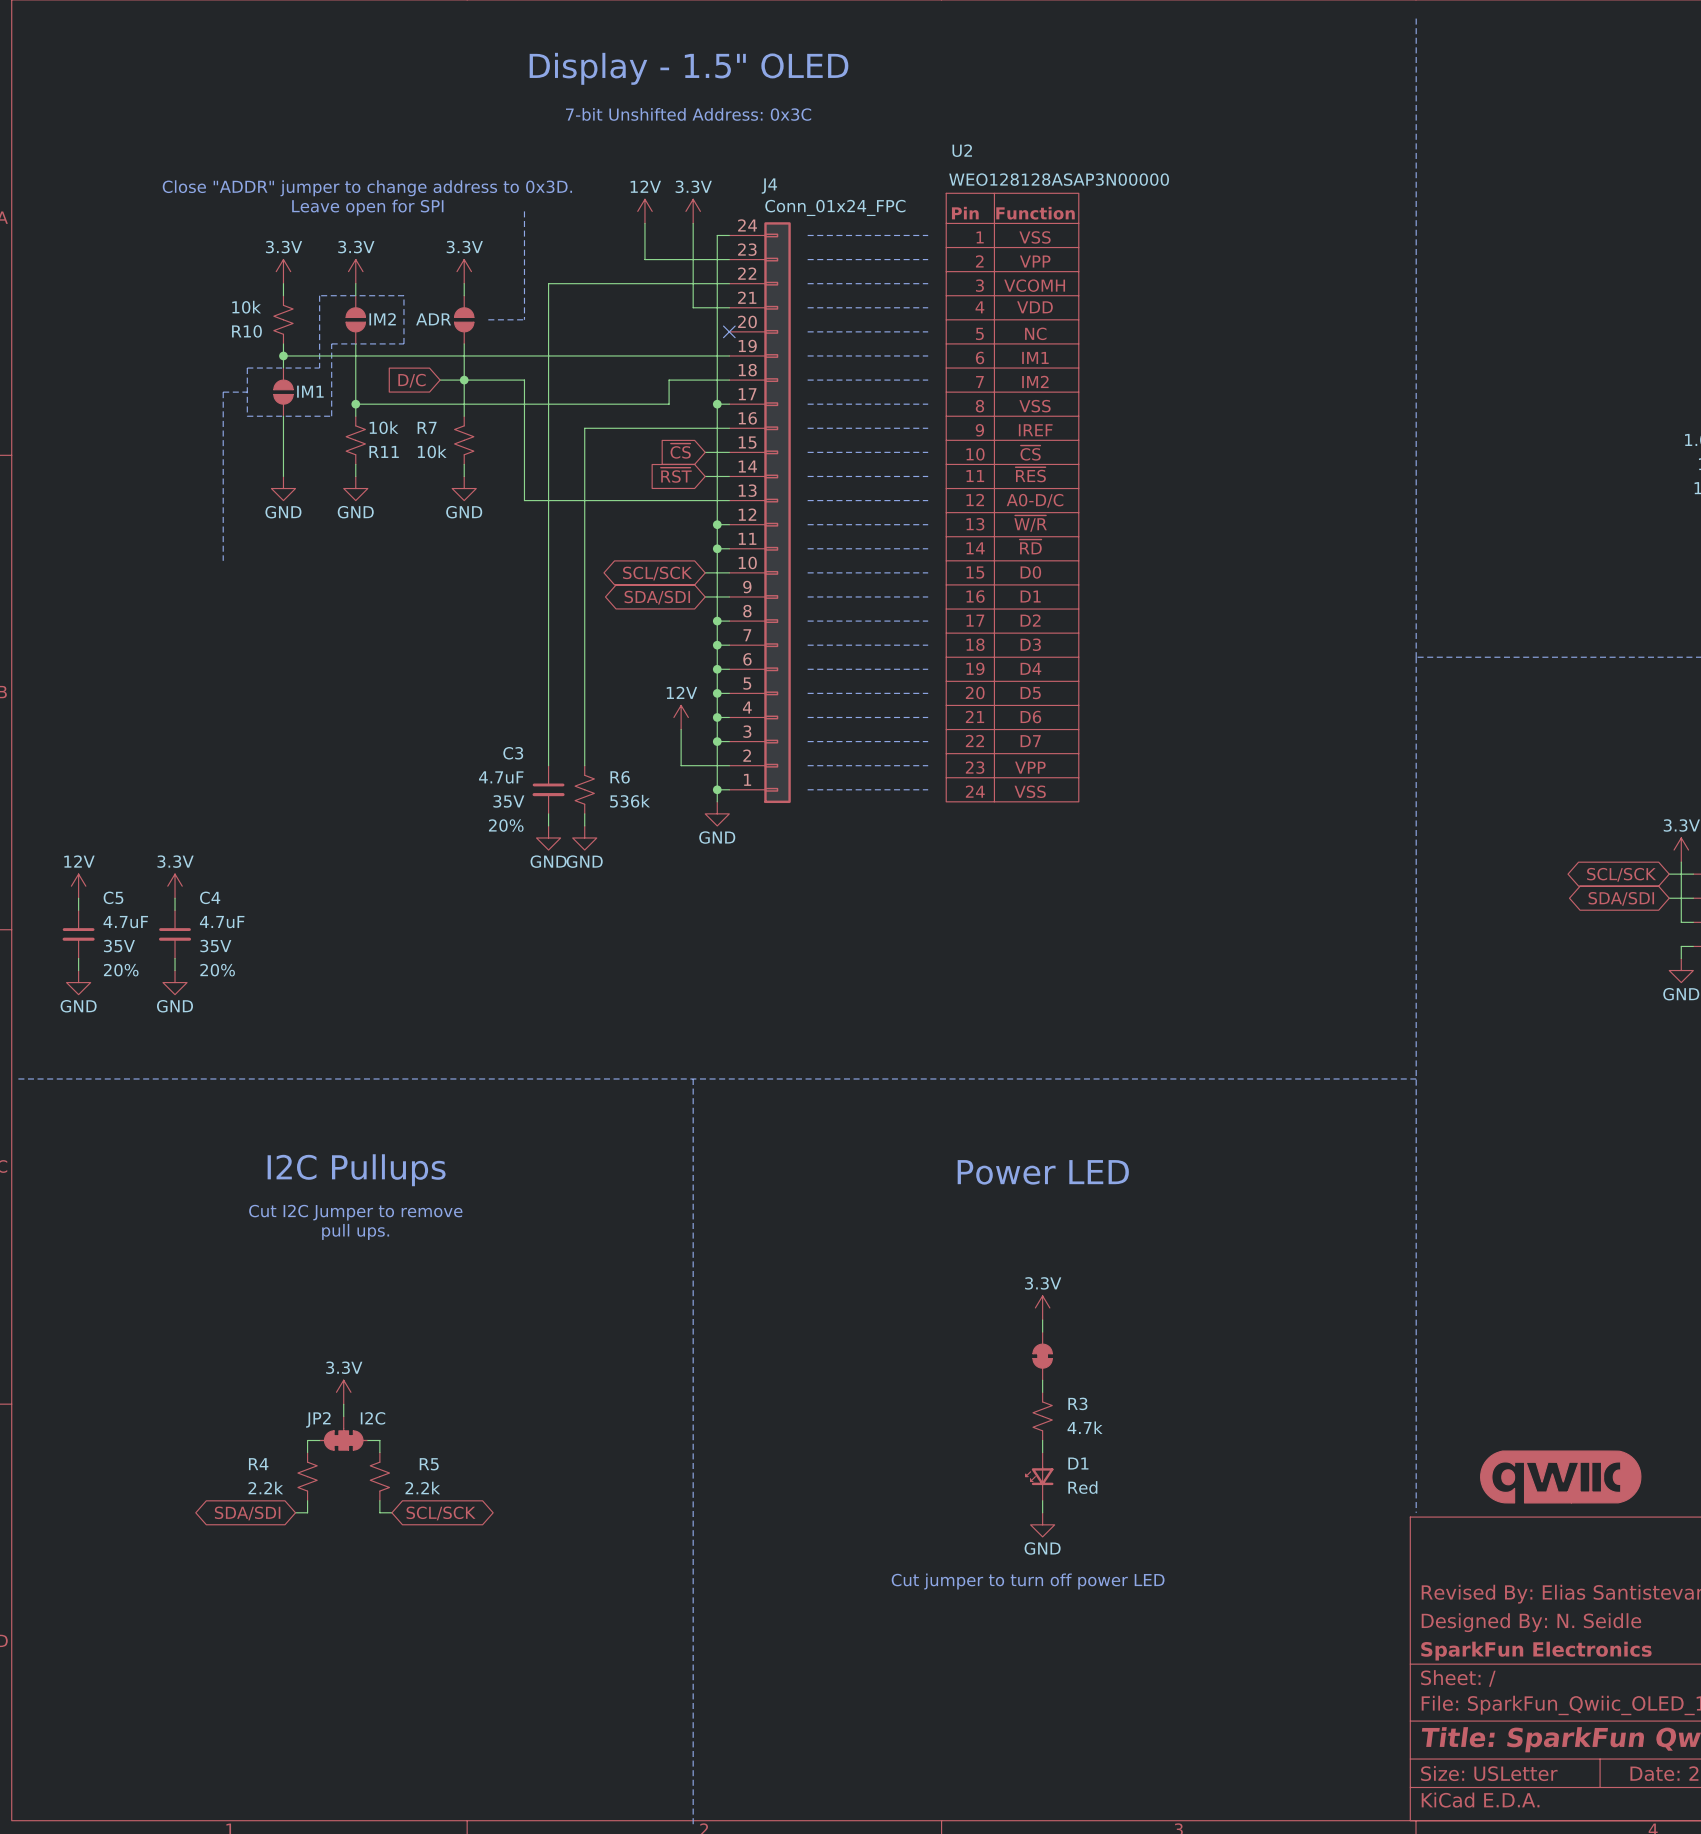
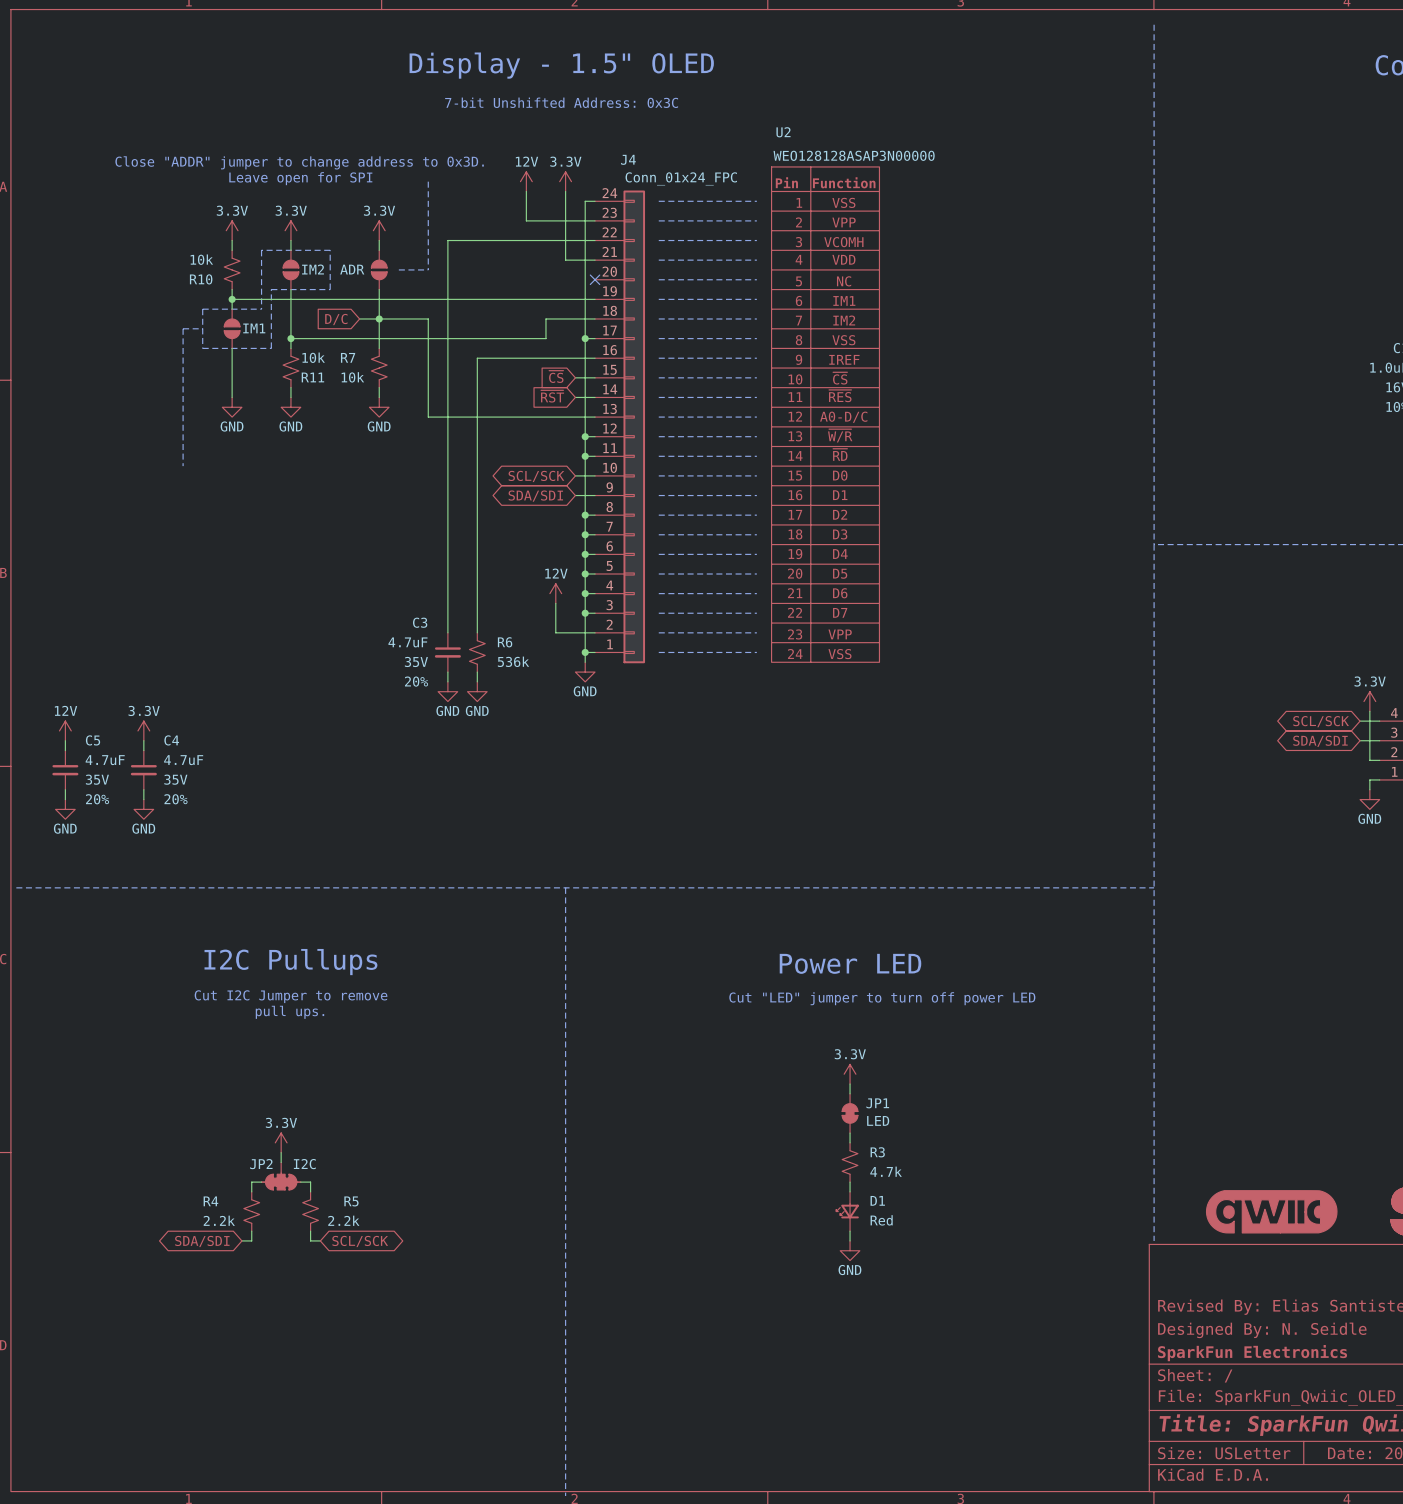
text: none -> Cut "LED" jumper to turn off power LED (882, 998)
JP1 name: none -> JP1 (877, 1103)
JP1 value: none -> LED (878, 1120)
text: Cut jumper to turn off power LED (1028, 1581) -> none

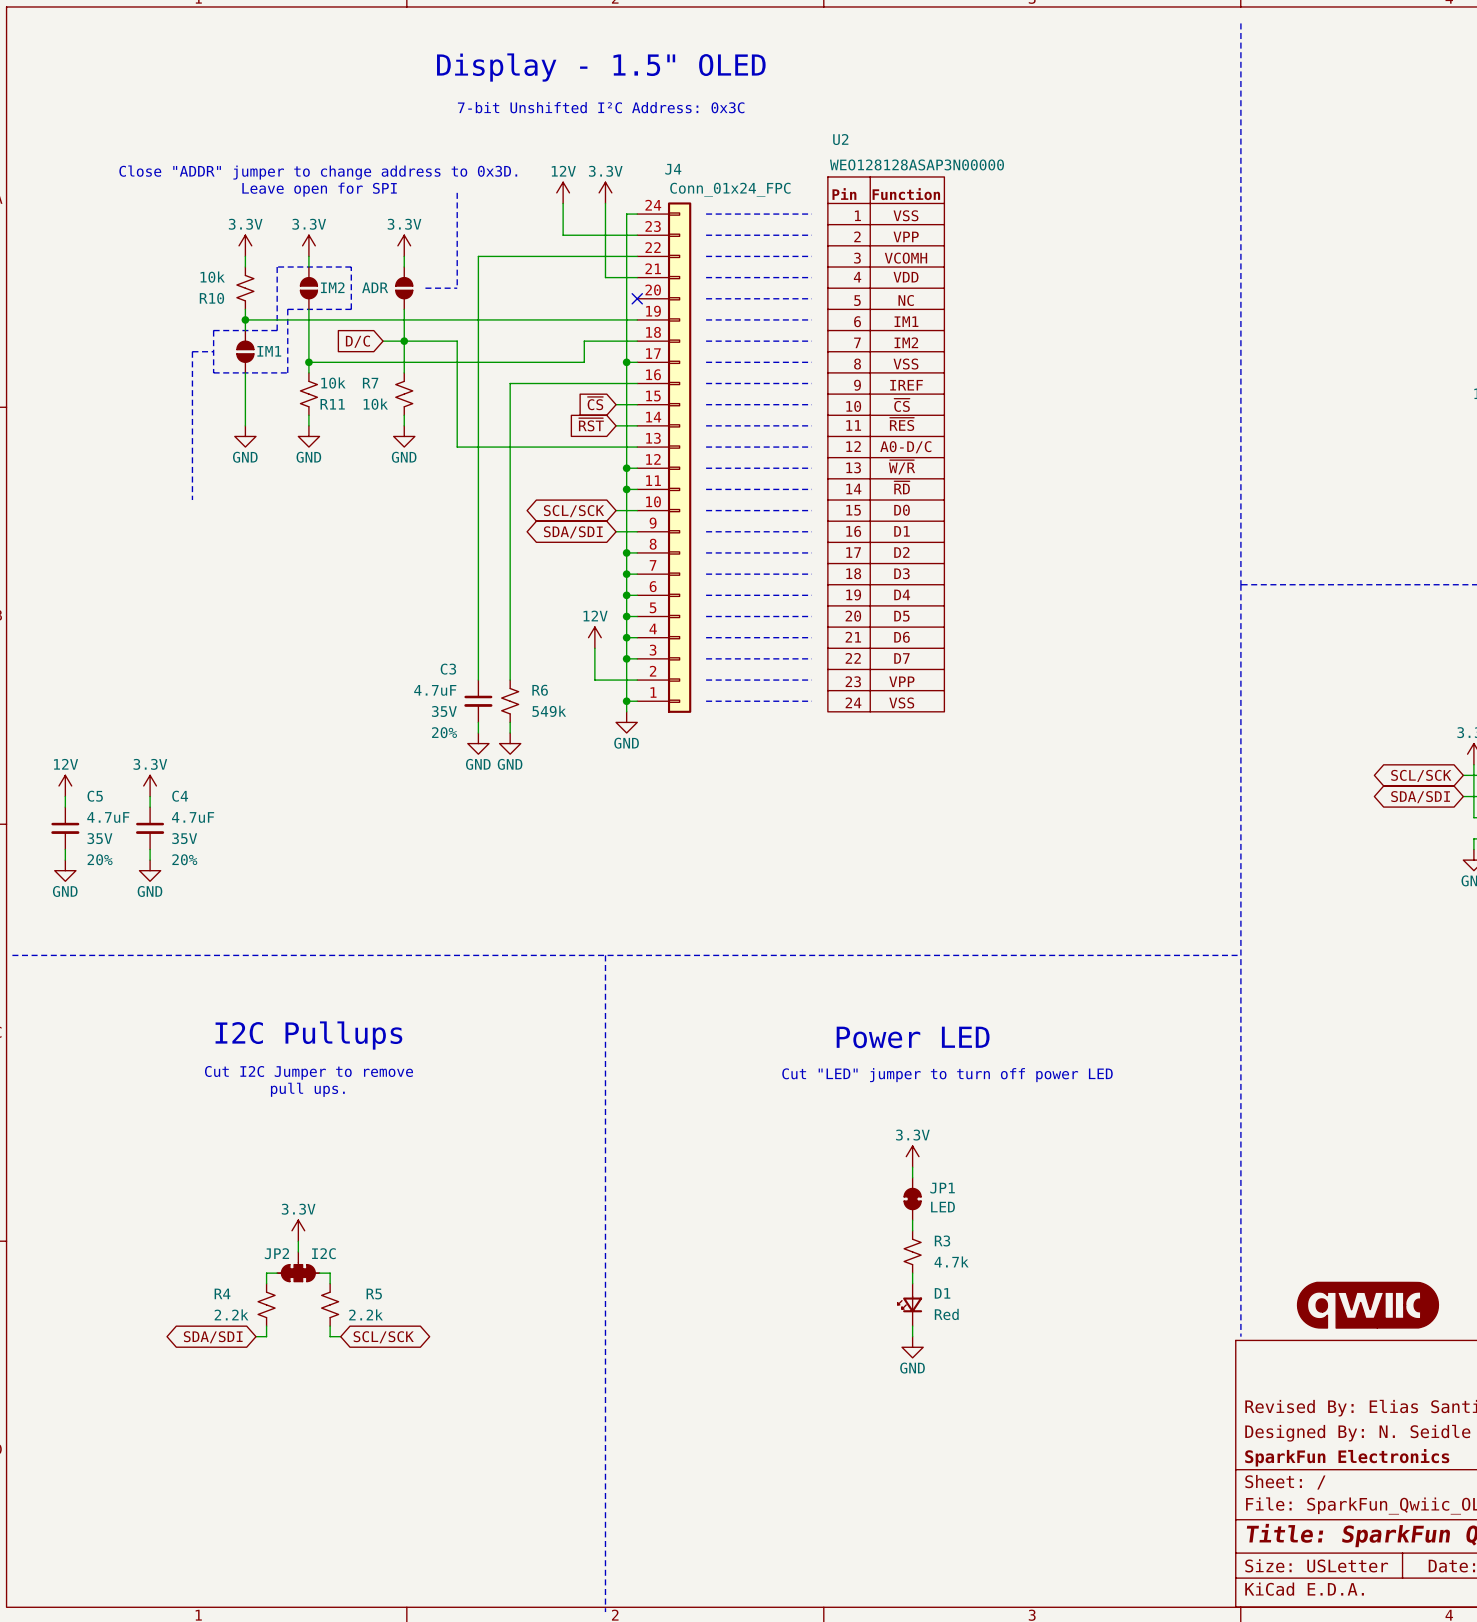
text: 7-bit Unshifted Address: 0x3C (561, 102) -> 7-bit Unshifted I²C Address: 0x3C (601, 107)
R6 value: 536k (513, 661) -> 549k (549, 711)

